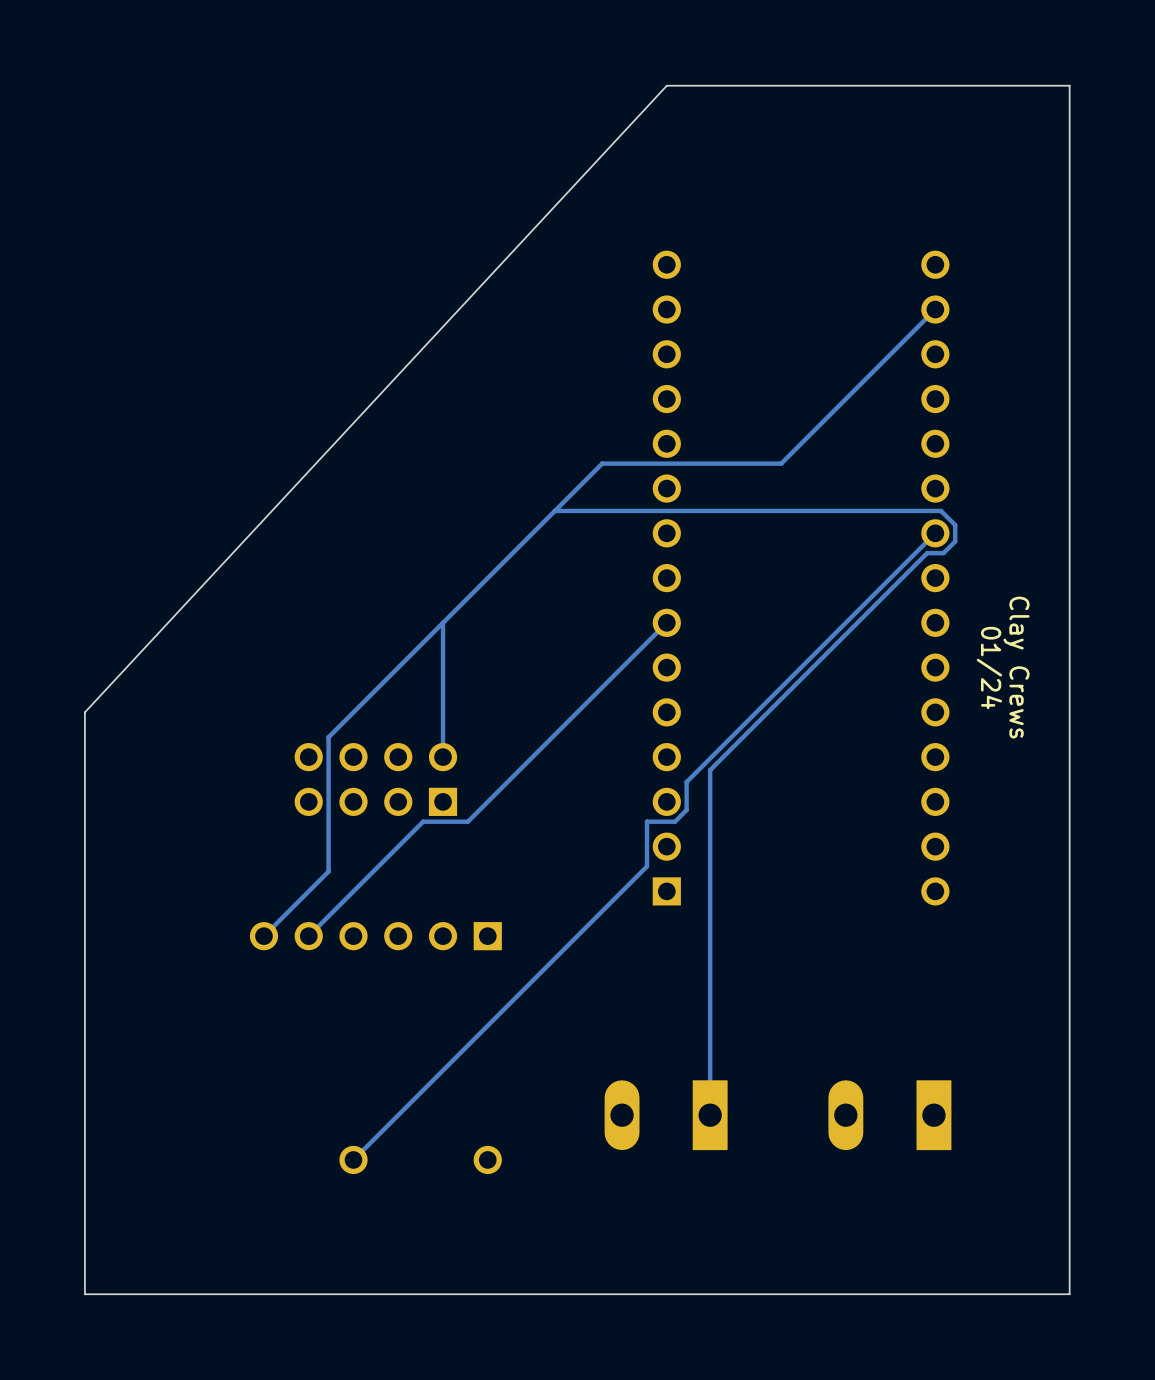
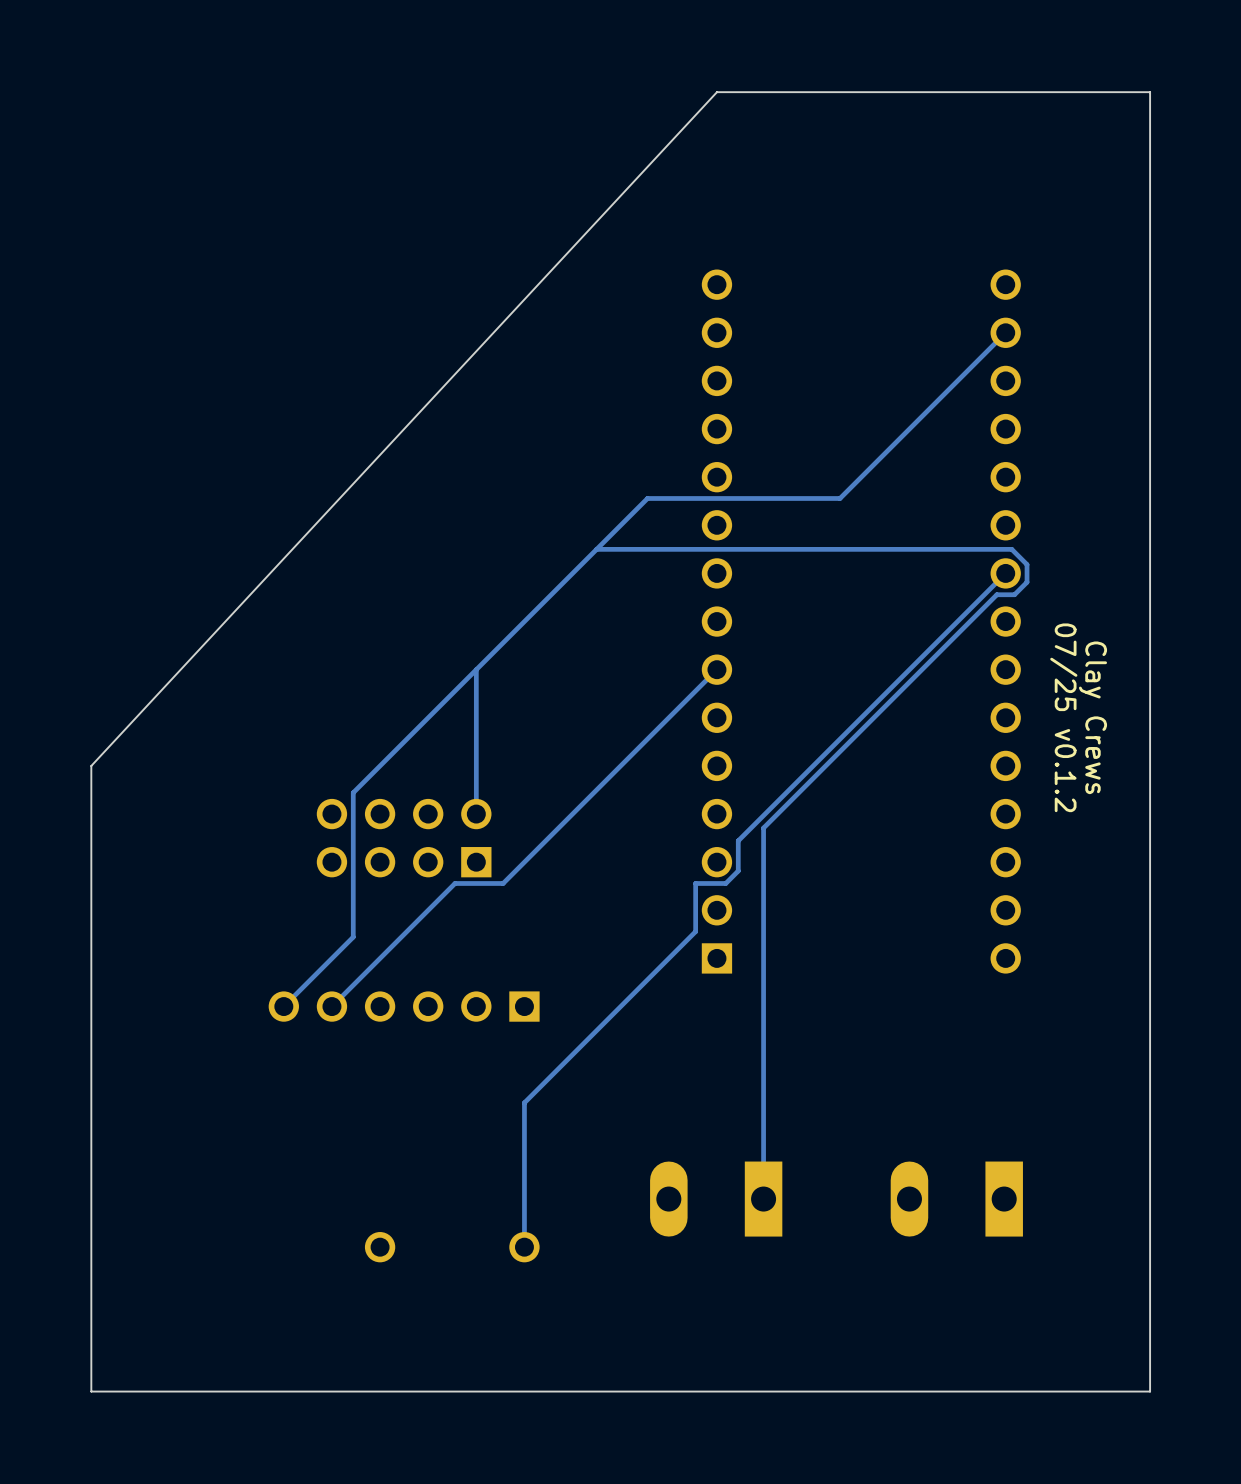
text: 01/24 (989, 668) -> 07/25 v0.1.2 (1063, 717)
track: (487, 1025) (353, 1159) -> (524, 1102) (524, 1247)

